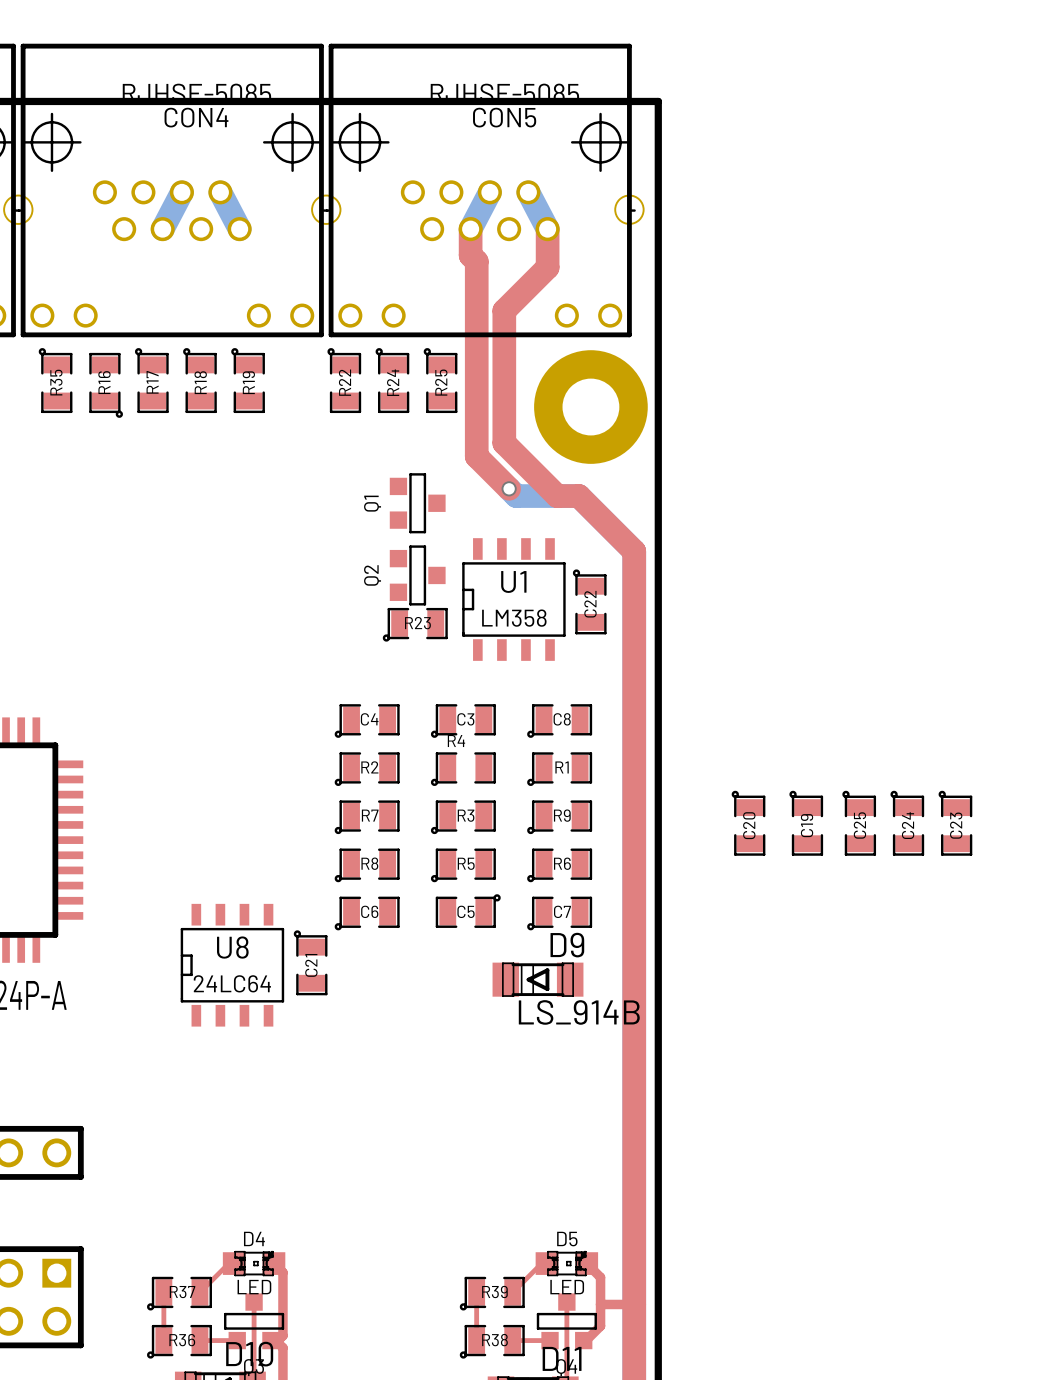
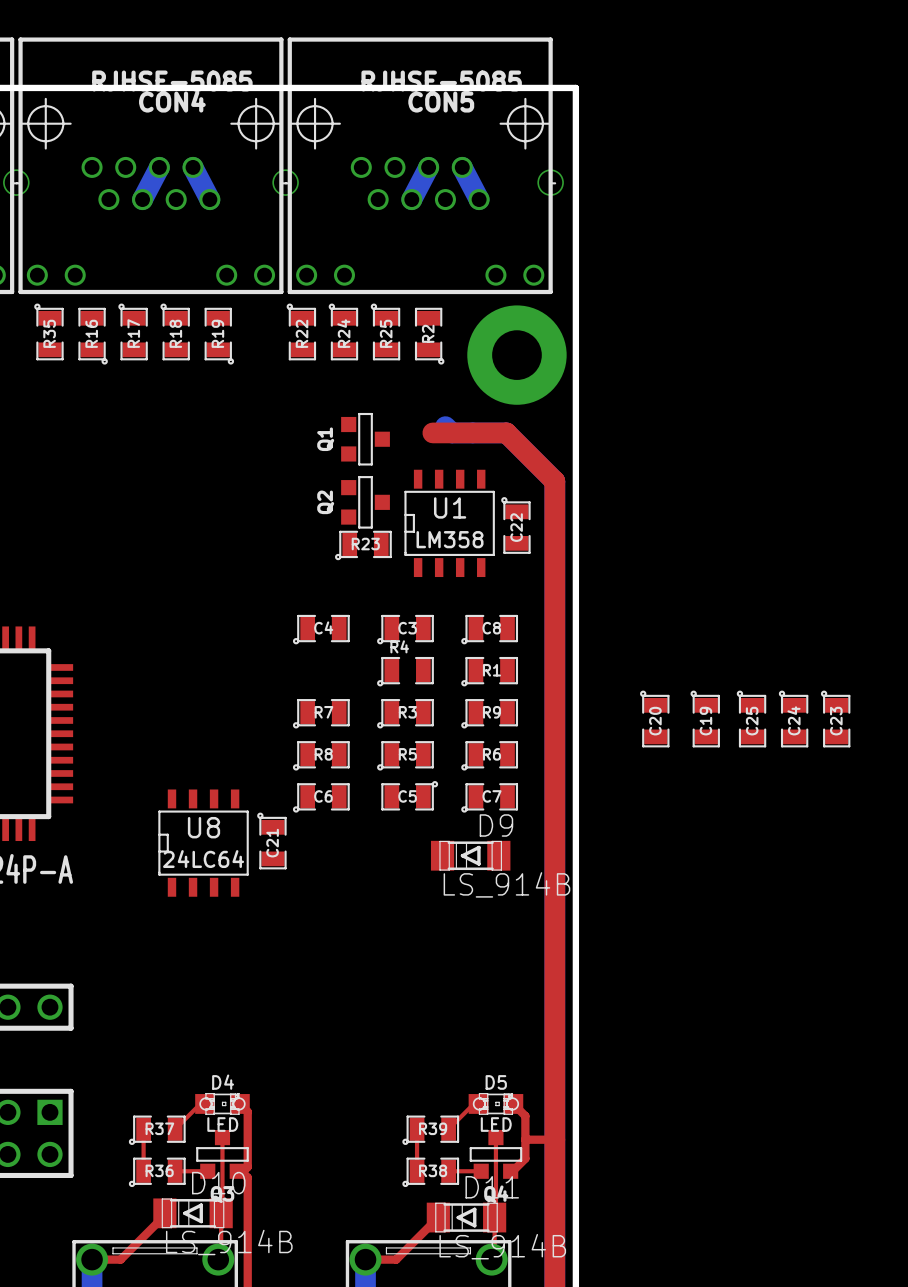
top track: (470, 229) (470, 255) (476, 261) (476, 456) (509, 488) -> none
top track: (547, 229) (547, 267) (504, 310) (504, 443) (557, 496) -> (432, 432) (487, 432)
R19 rotation: 0° (248, 380) -> 180° (219, 336)
via: (509, 488) -> none
R2 rotation: 0° (367, 769) -> 90° counterclockwise (429, 336)
R2 position: (367, 769) -> (429, 336)
D4 footprint: [222, 1251, 286, 1277] -> [195, 1093, 250, 1115]
D5 footprint: [535, 1251, 599, 1277] -> [468, 1093, 524, 1115]

